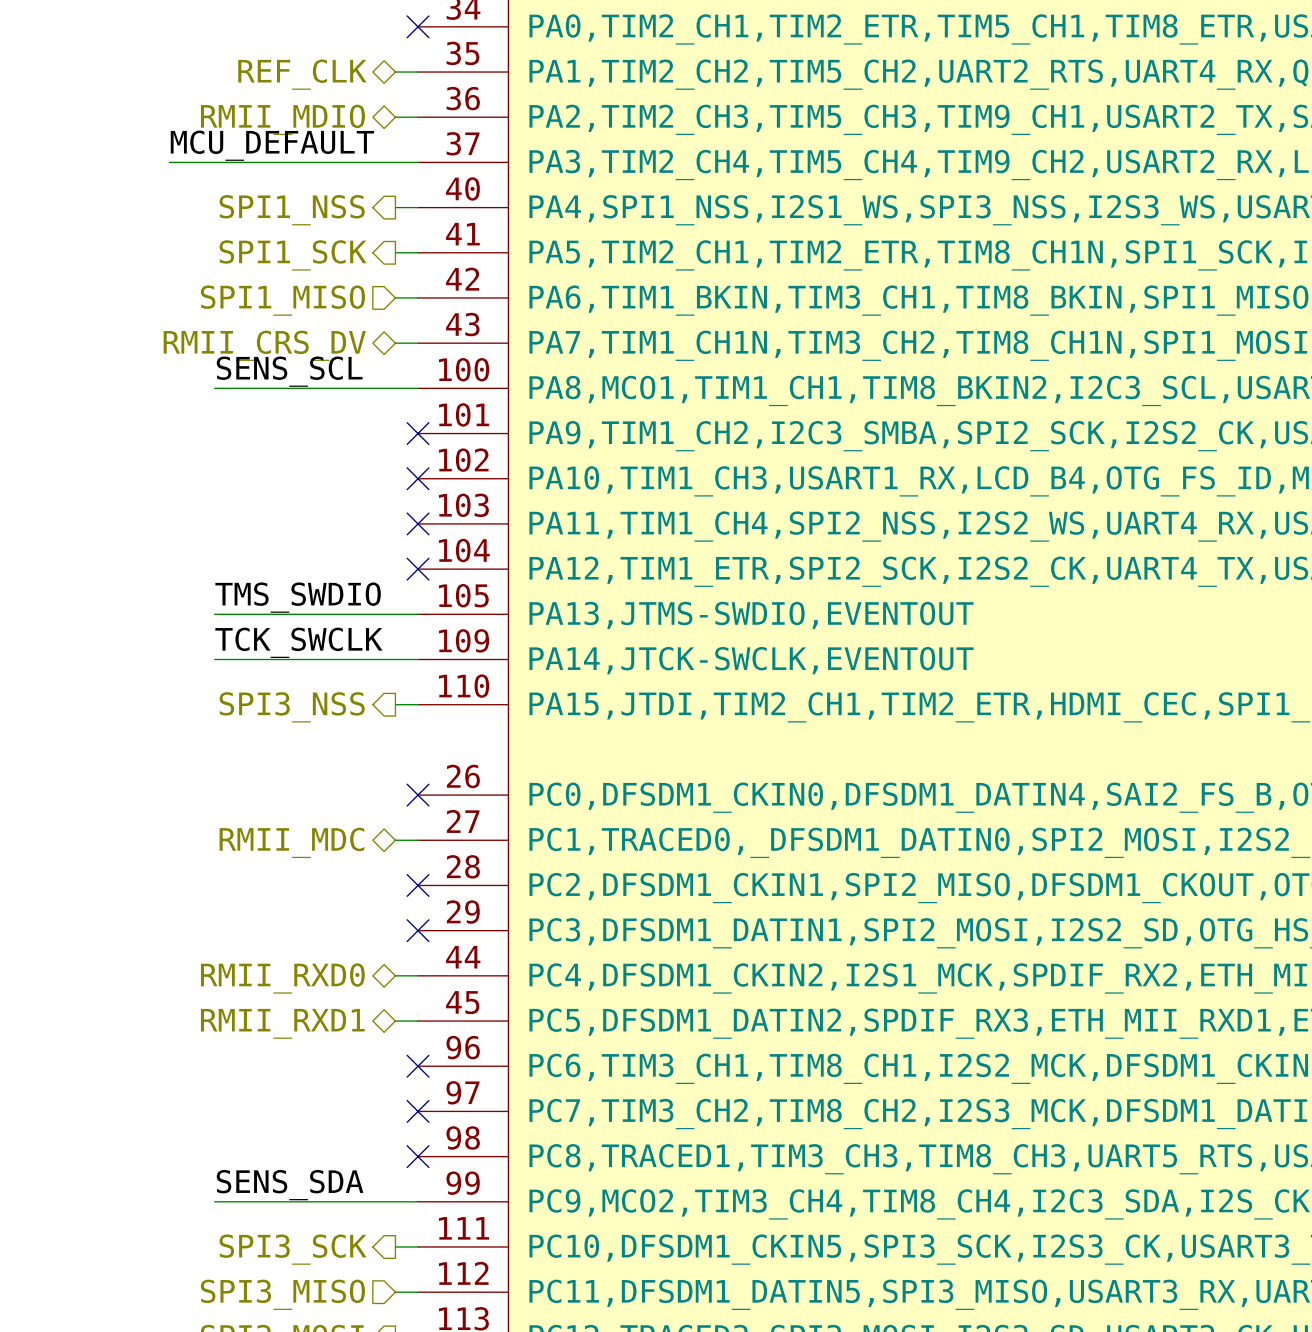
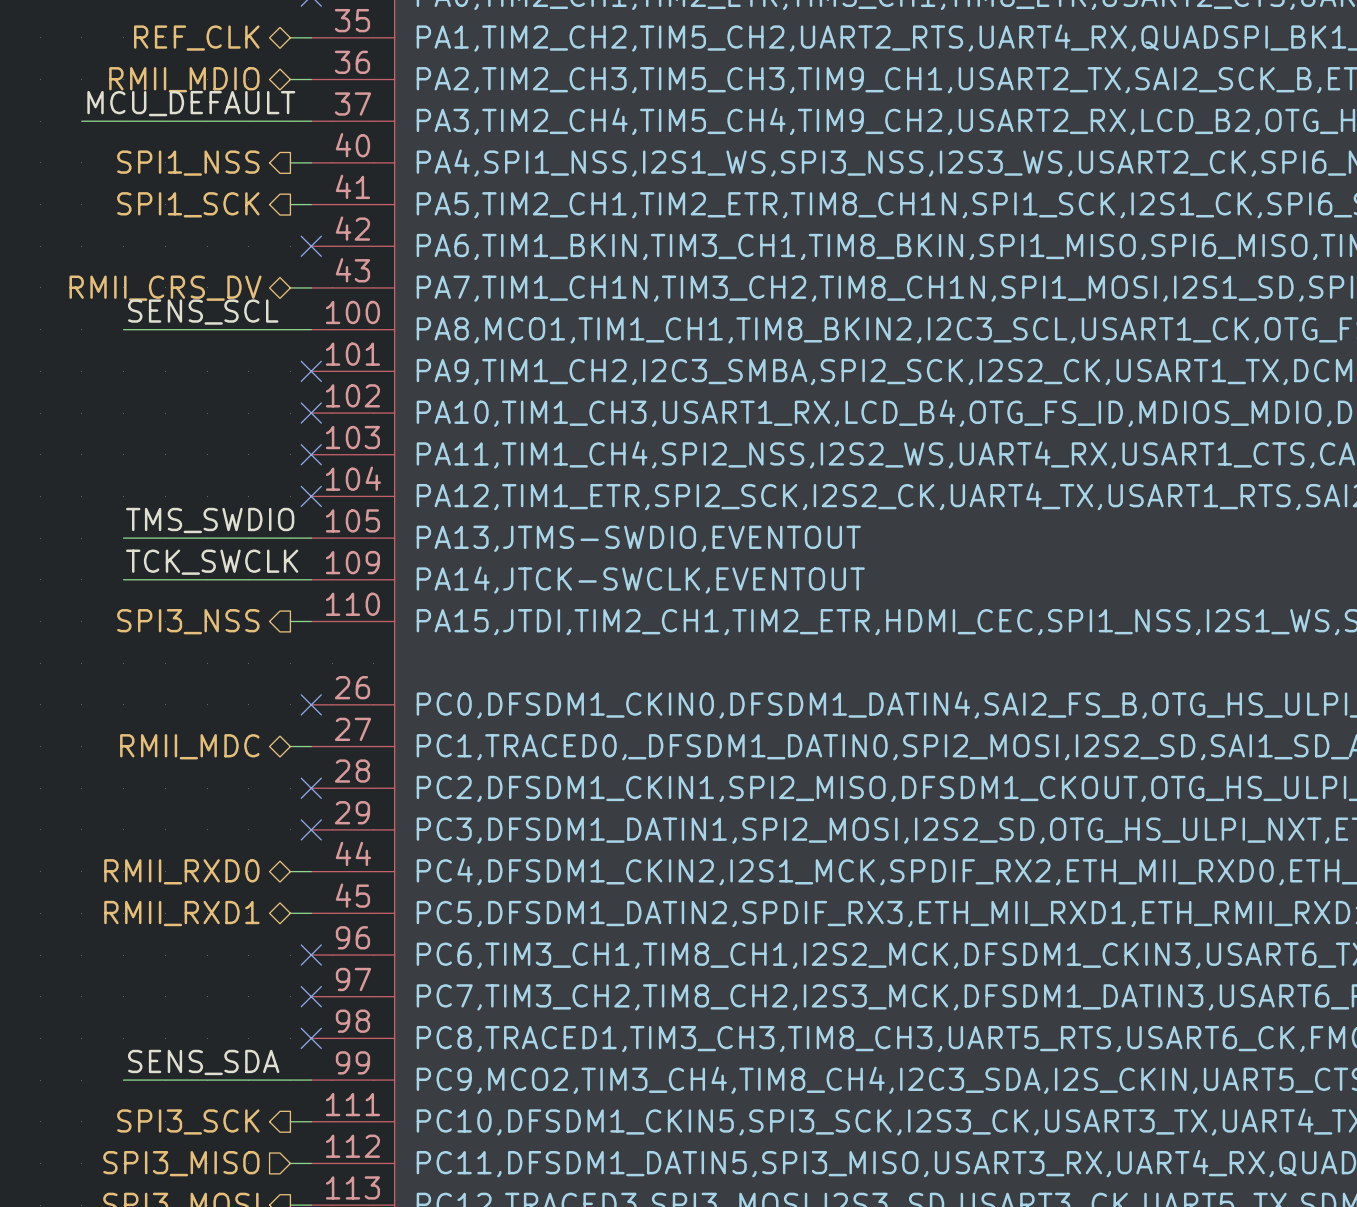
wire: (395, 297) (418, 297) -> none
no-connect mark: none -> (311, 246)
hierarchical label: SPI1_MISO (282, 300) -> none

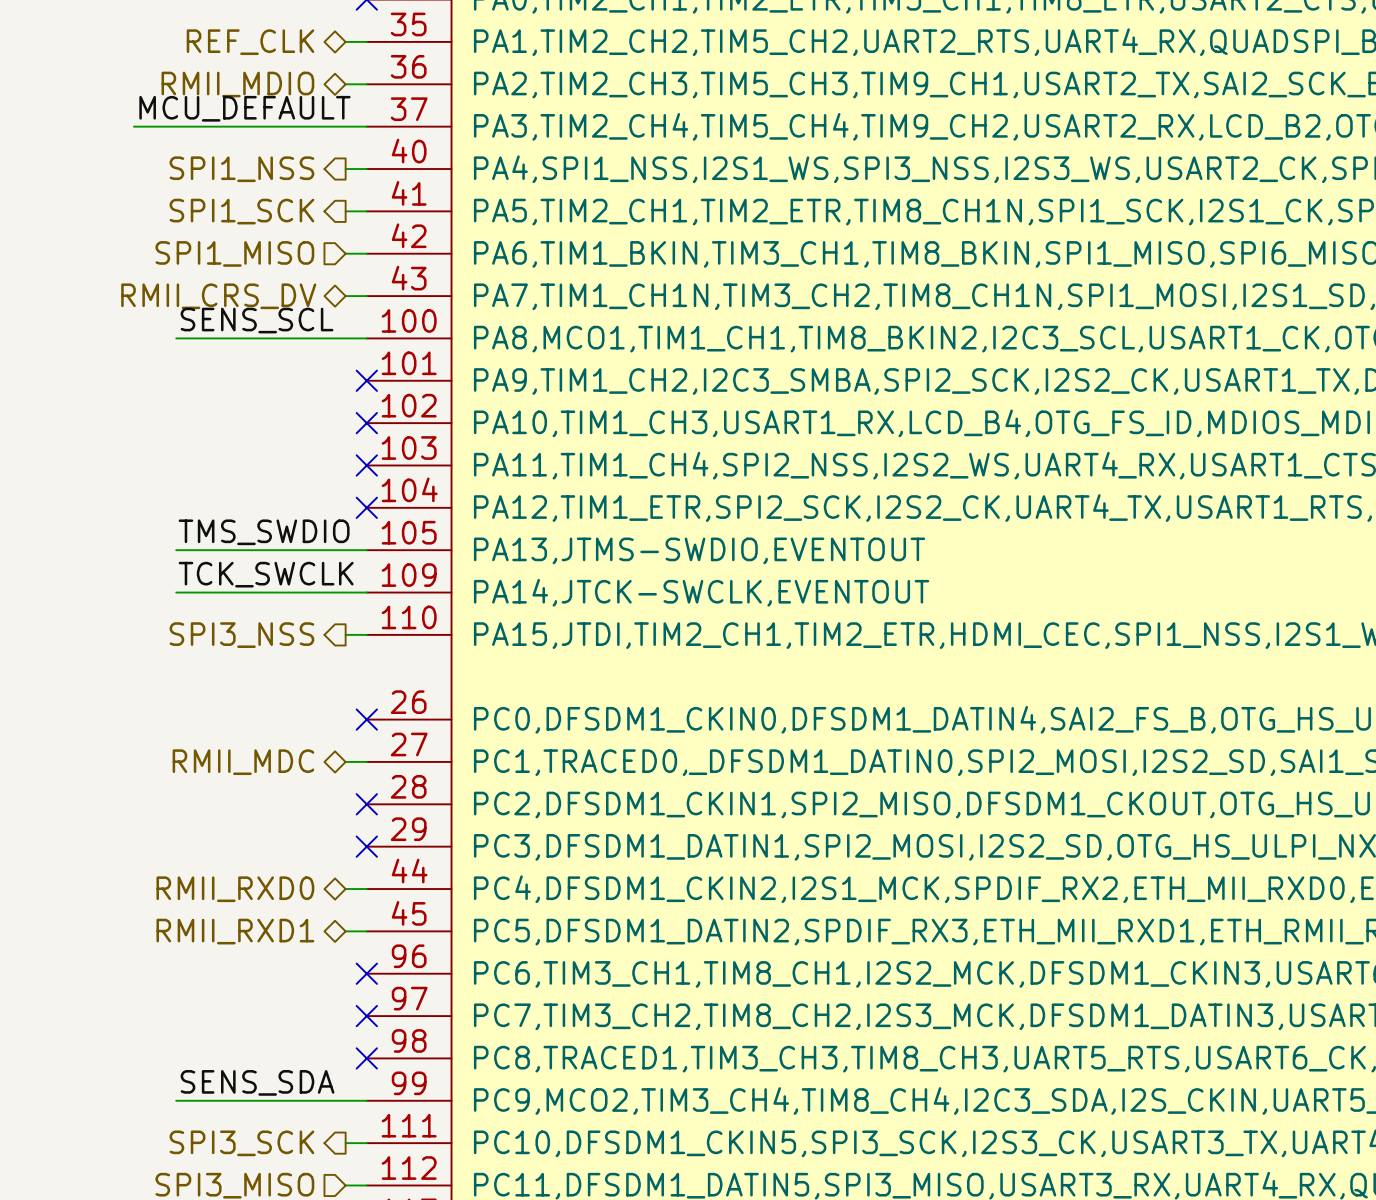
hierarchical label: none -> SPI1_MISO (234, 253)
wire: none -> (345, 253) (366, 253)
no-connect mark: (311, 246) -> none

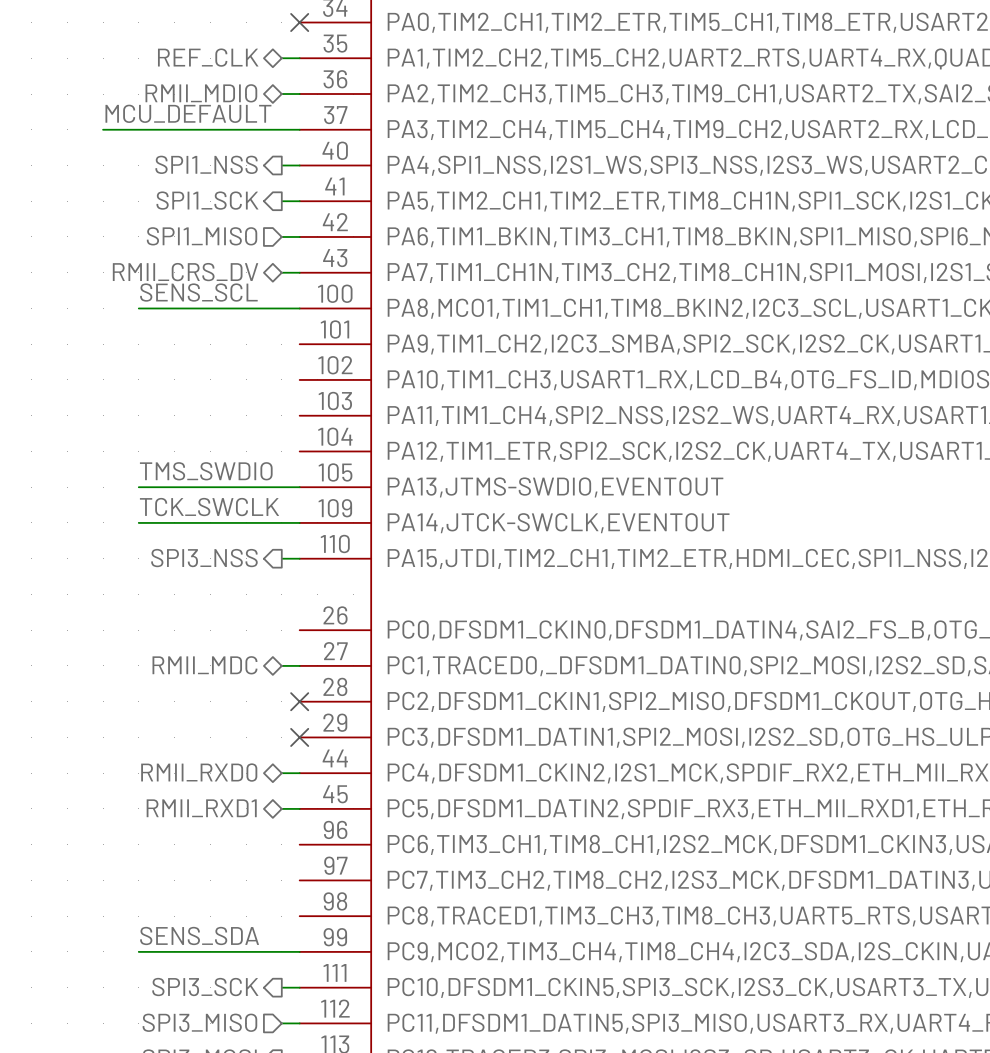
no-connect mark: (366, 380) -> none
no-connect mark: (366, 423) -> none
no-connect mark: (366, 465) -> none
no-connect mark: (366, 507) -> none
no-connect mark: (366, 719) -> none
no-connect mark: (366, 973) -> none
no-connect mark: (366, 1016) -> none
no-connect mark: (366, 1058) -> none

